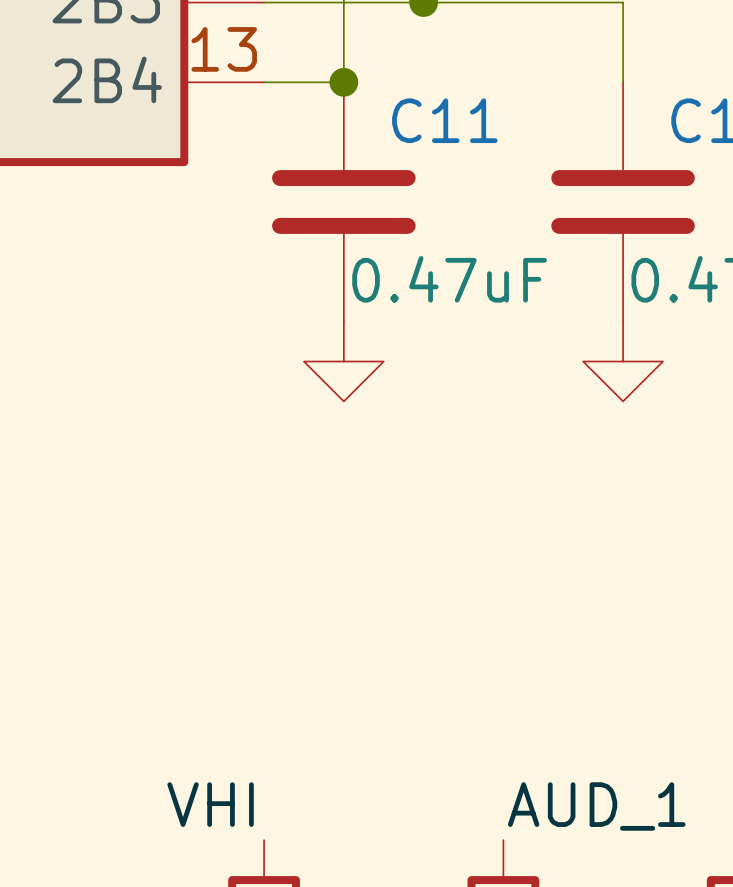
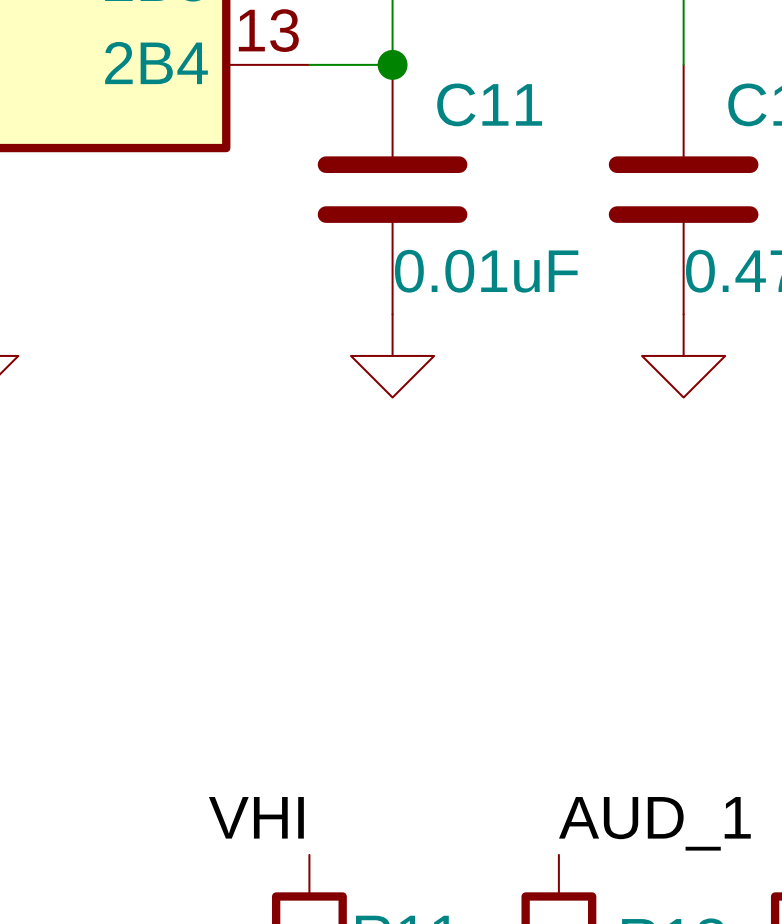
C11 value: 0.47uF (449, 279) -> 0.01uF (486, 271)

